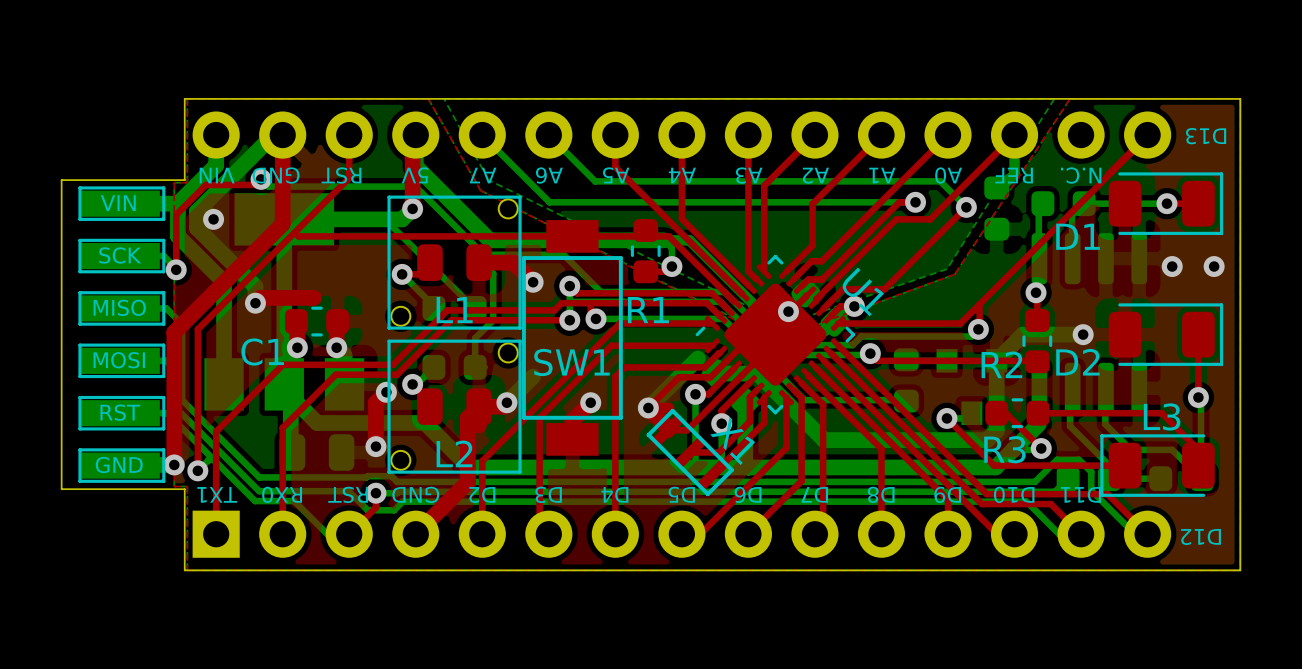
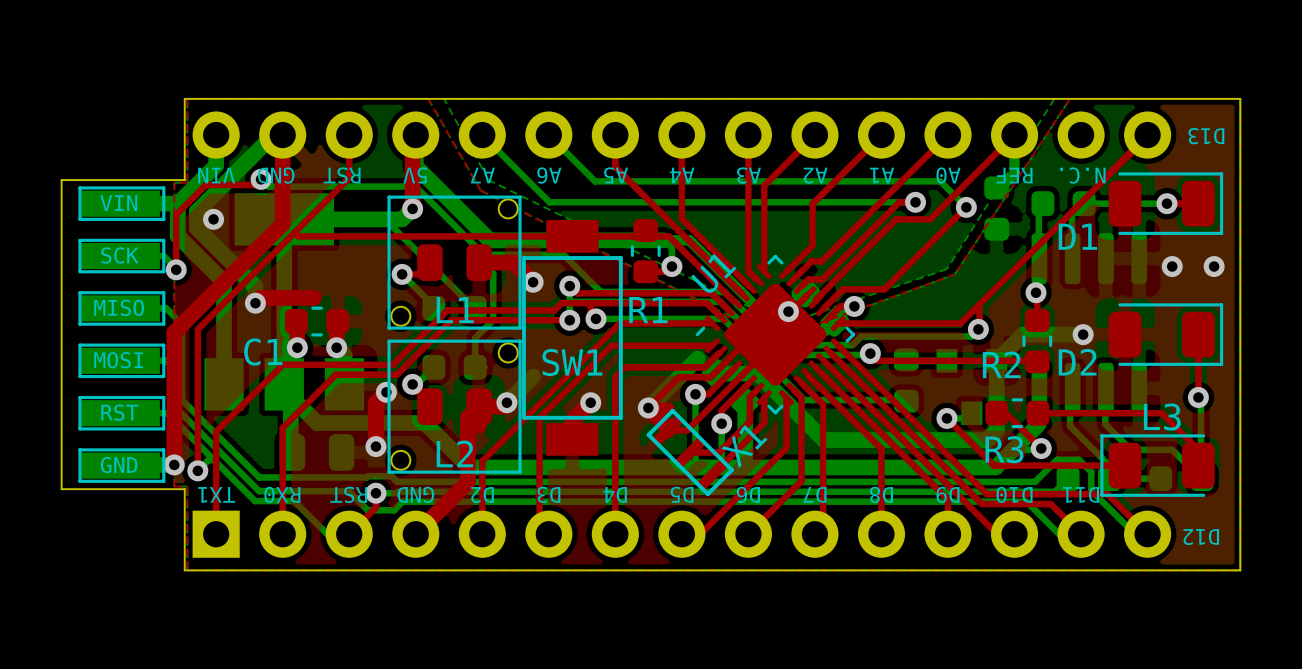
U1 name rotation: 0° (863, 291) -> 90° counterclockwise (713, 273)
U1 name position: U1 (863, 291) -> U1 (713, 273)
X1 name rotation: 0° (732, 440) -> 90° counterclockwise (744, 446)

